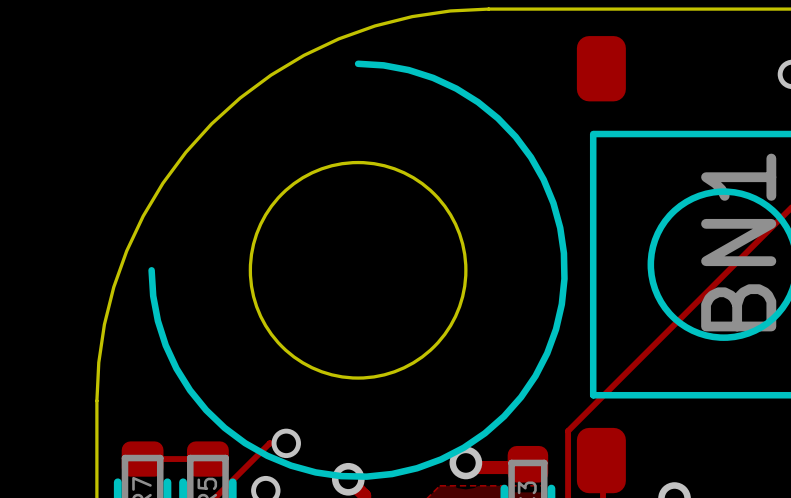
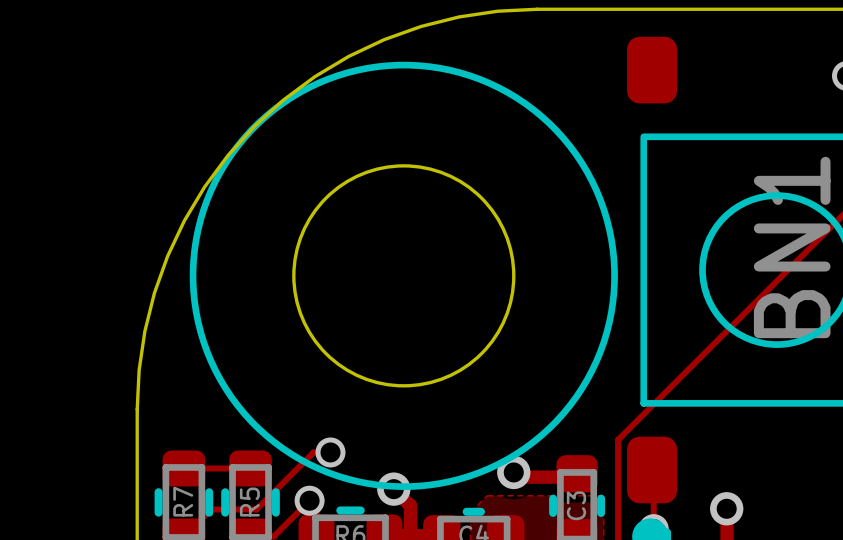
drawing: none -> [189, 61, 618, 490]
line: (358, 63) (383, 65) (408, 70) (433, 77) (456, 88) (478, 102) (497, 118) (515, 136) (531, 157) (543, 179) (553, 203) (560, 227) (563, 253) (564, 278) (561, 304) (556, 329) (547, 353) (535, 376) (521, 397) (504, 416) (484, 433) (463, 447) (441, 459) (417, 468) (392, 474) (366, 476) (341, 476) (315, 472) (291, 465) (267, 455) (245, 443) (224, 427) (206, 410) (190, 390) (176, 368) (165, 345) (157, 321) (153, 295) (151, 270) -> none

